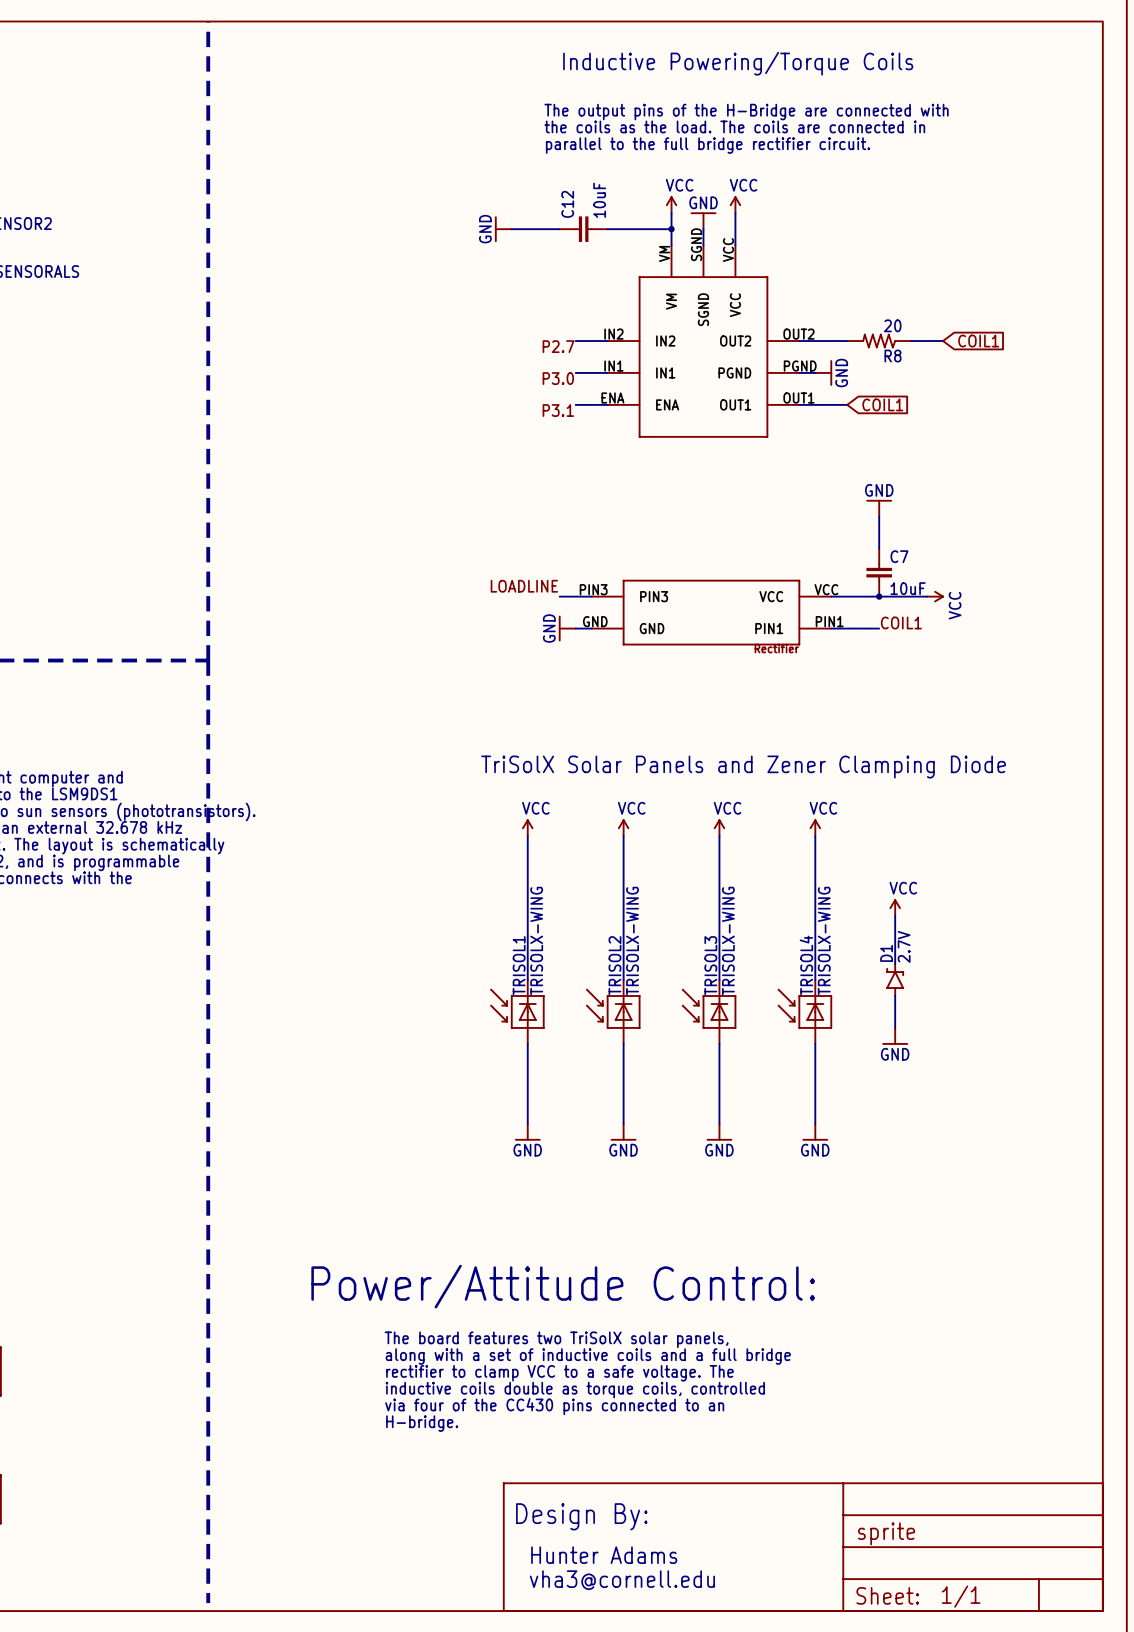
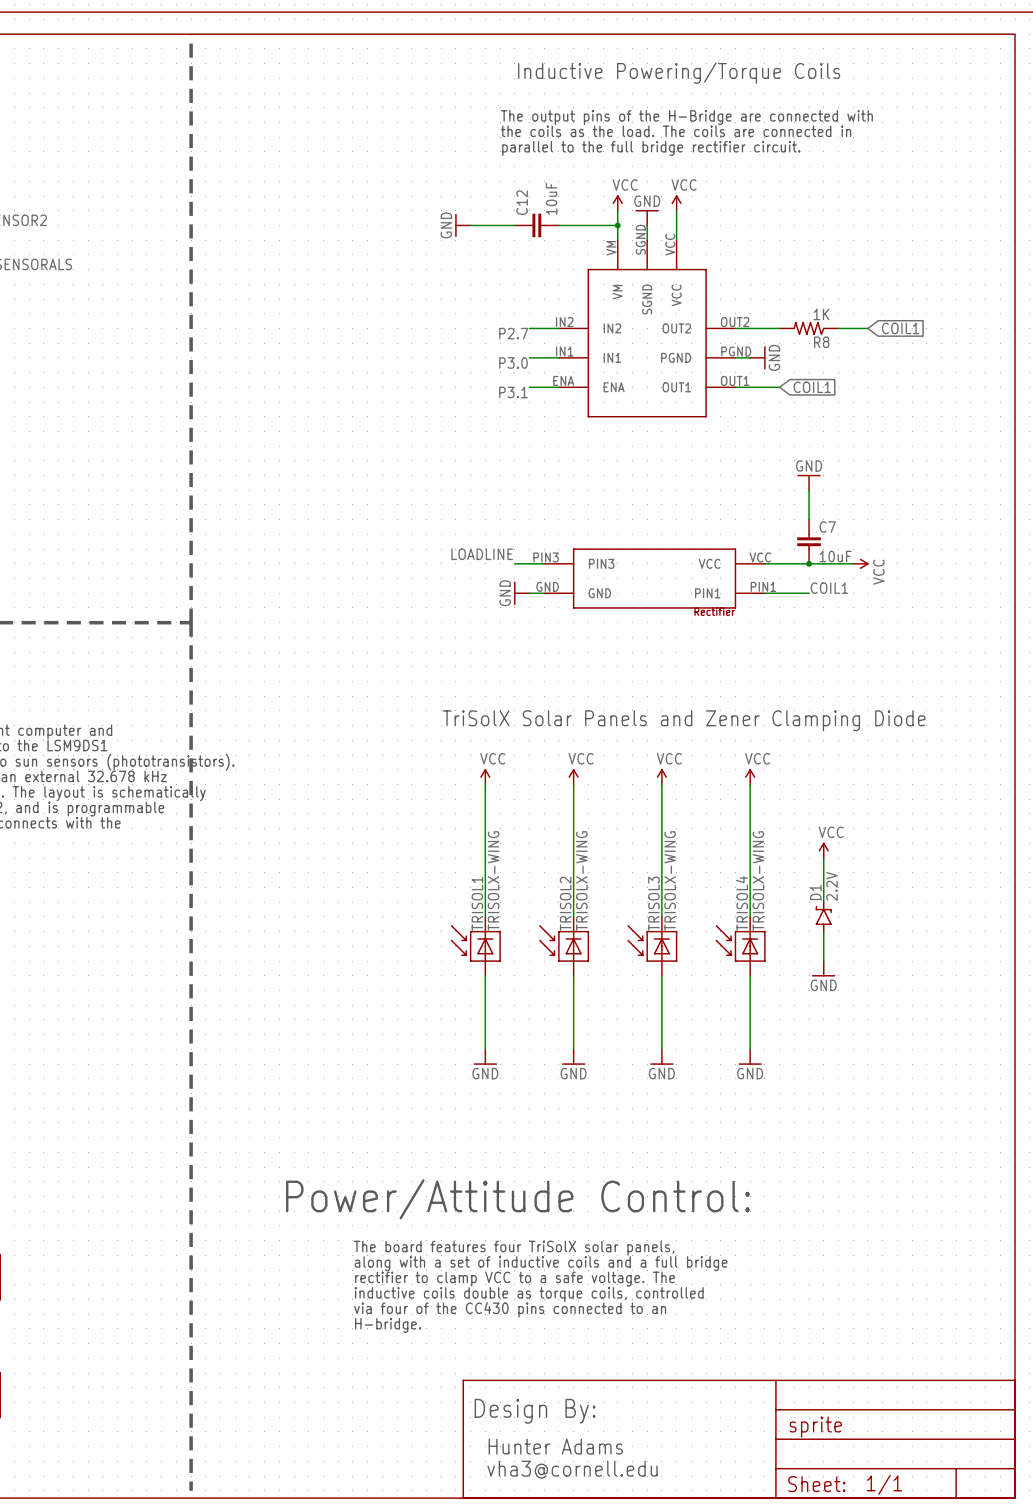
R8 value: 20 (892, 325) -> 1K (821, 314)
D1 value: 2.7V (904, 946) -> 2.2V (831, 886)
text: The board features two TriSolX solar panels, (556, 1339) -> The board features four TriSolX solar panels, (514, 1248)

